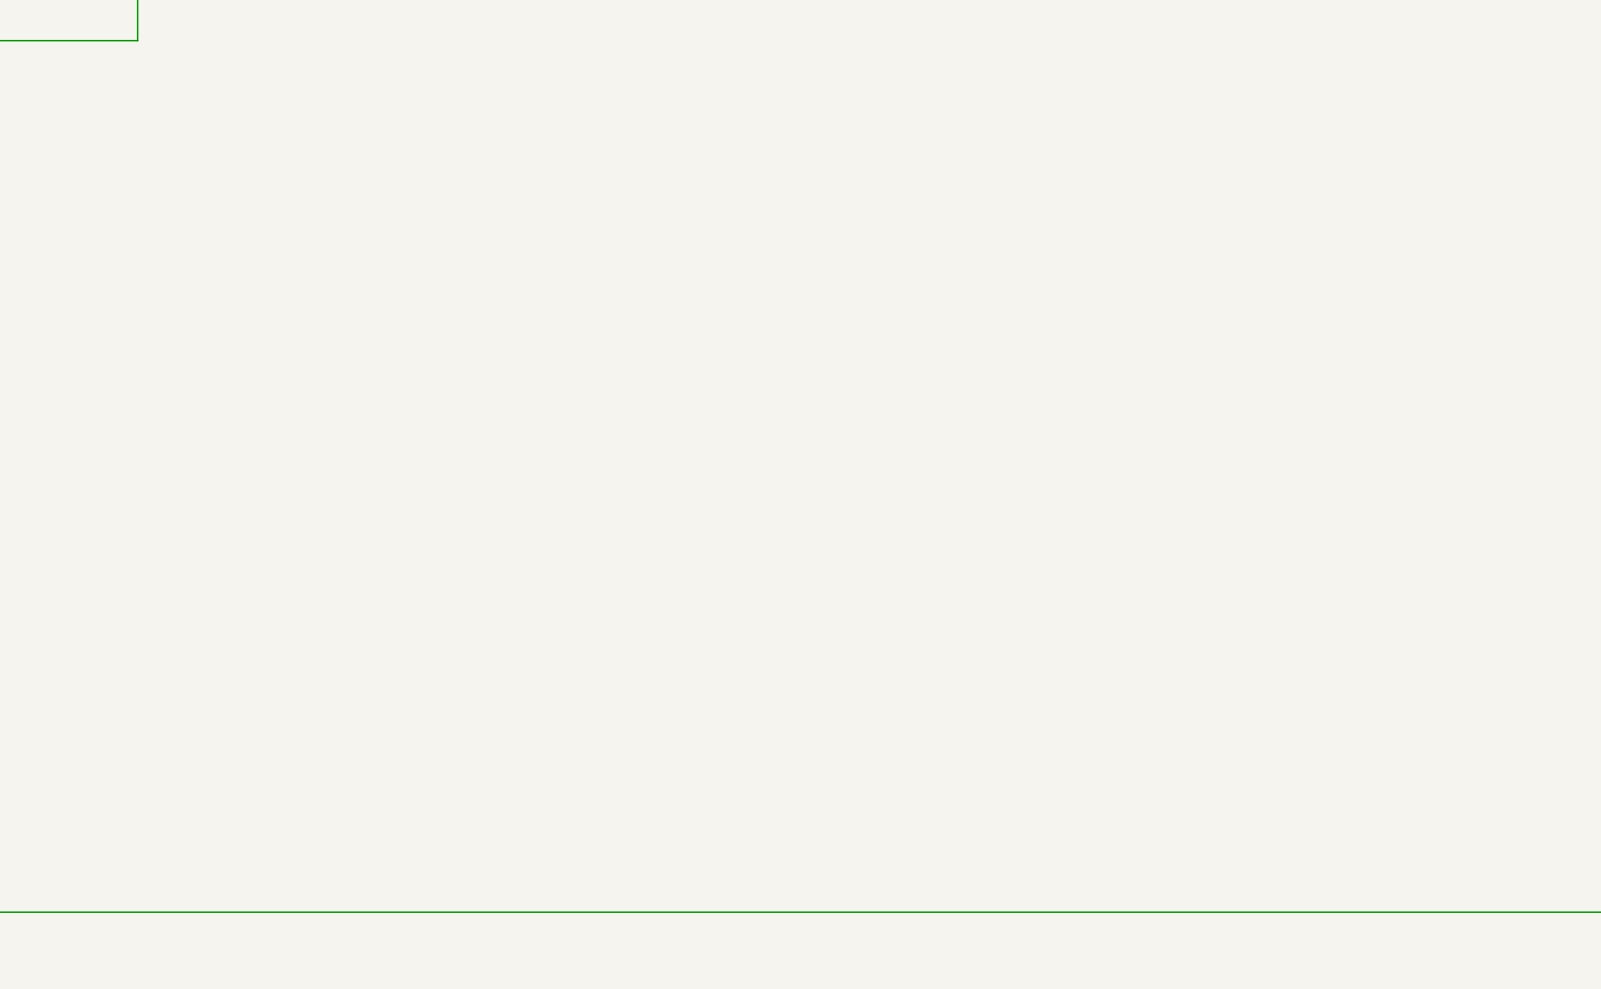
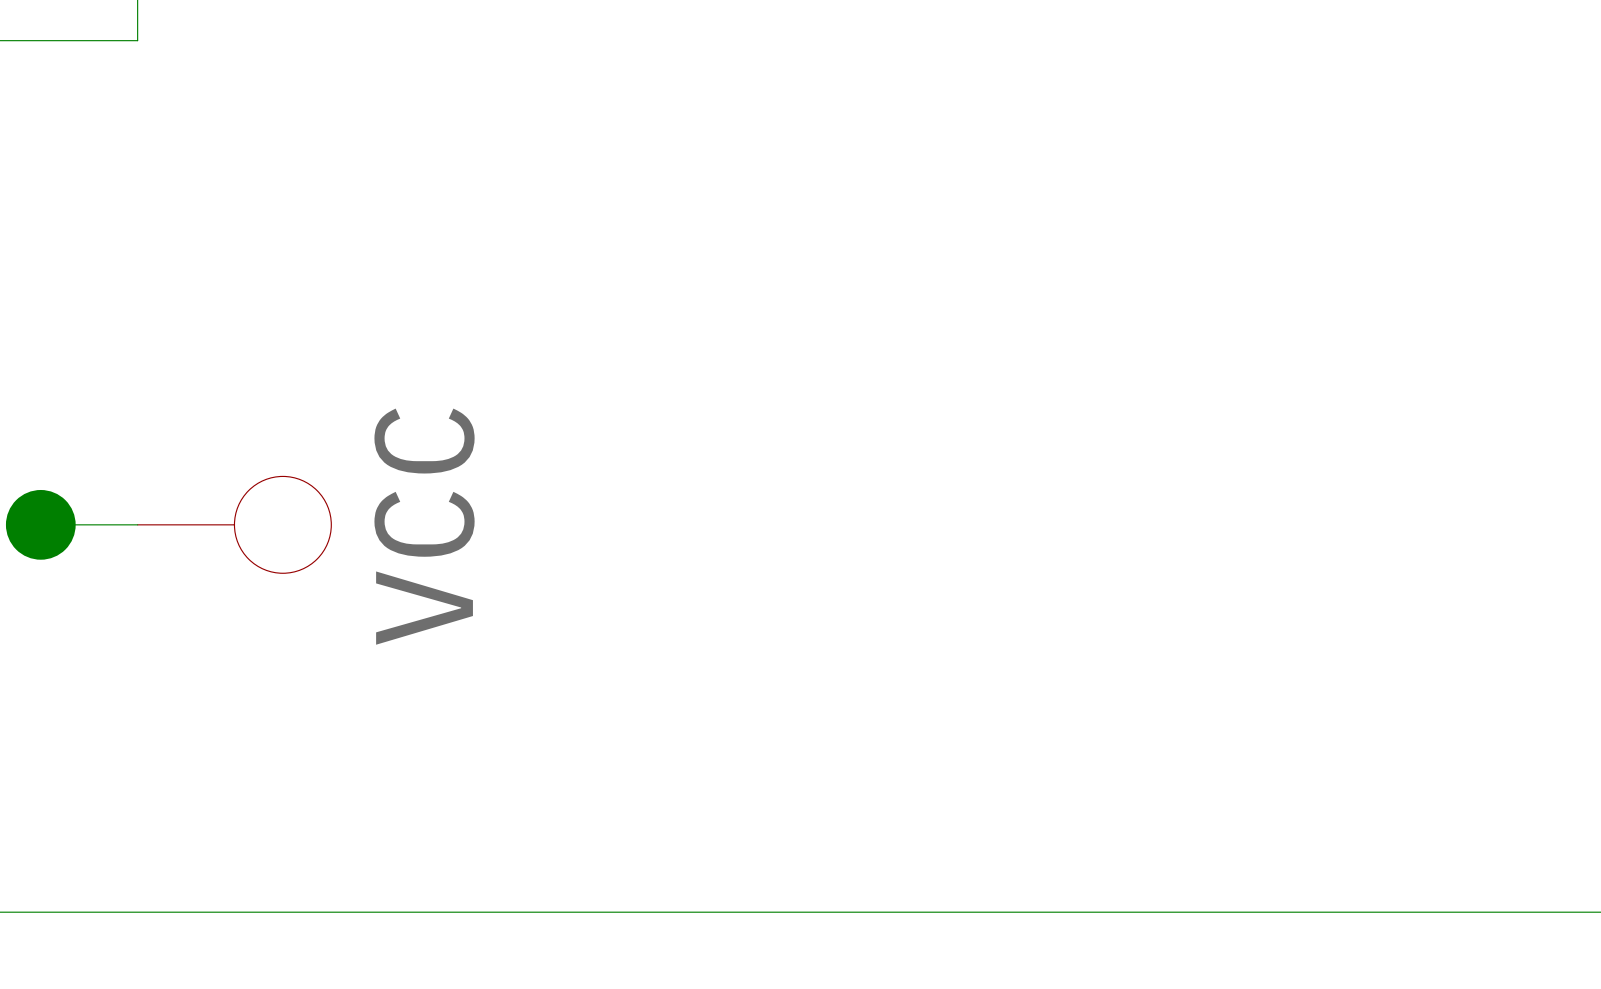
wire: none -> (40, 524) (137, 524)
junction: none -> (40, 524)
power symbol: none -> VCC (234, 524)

